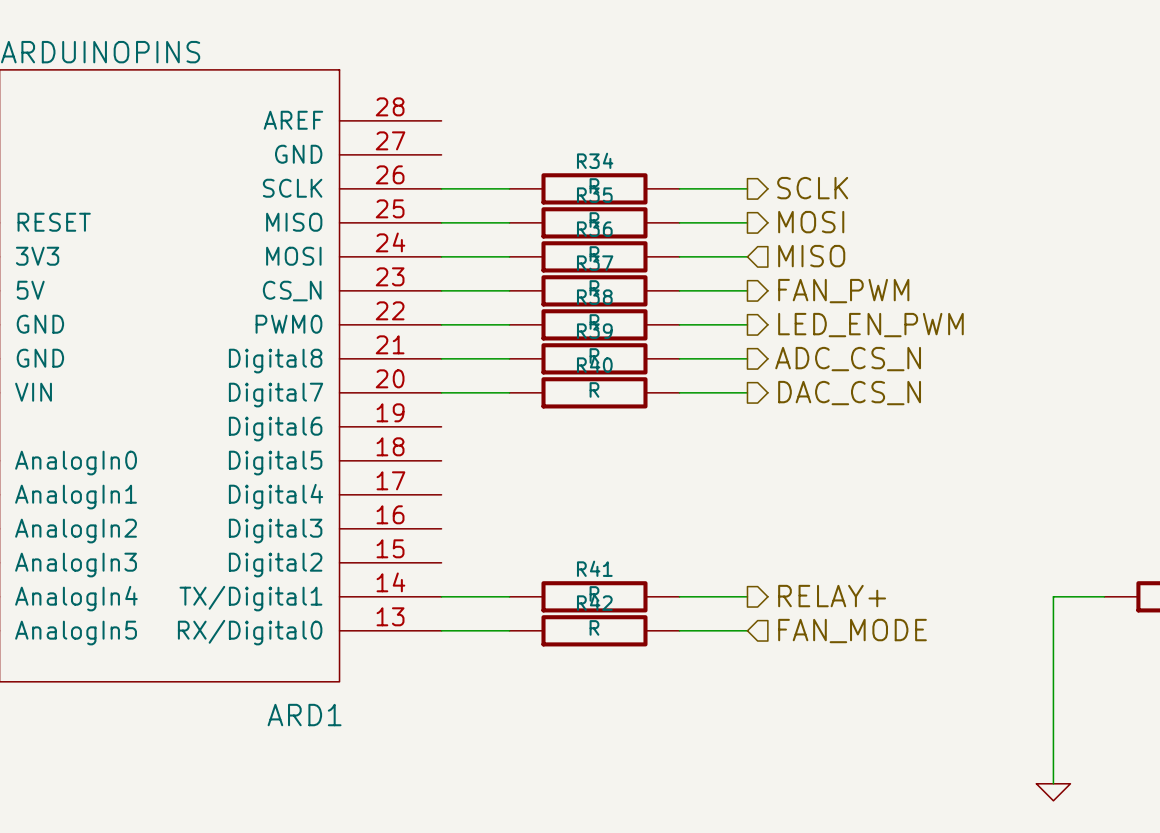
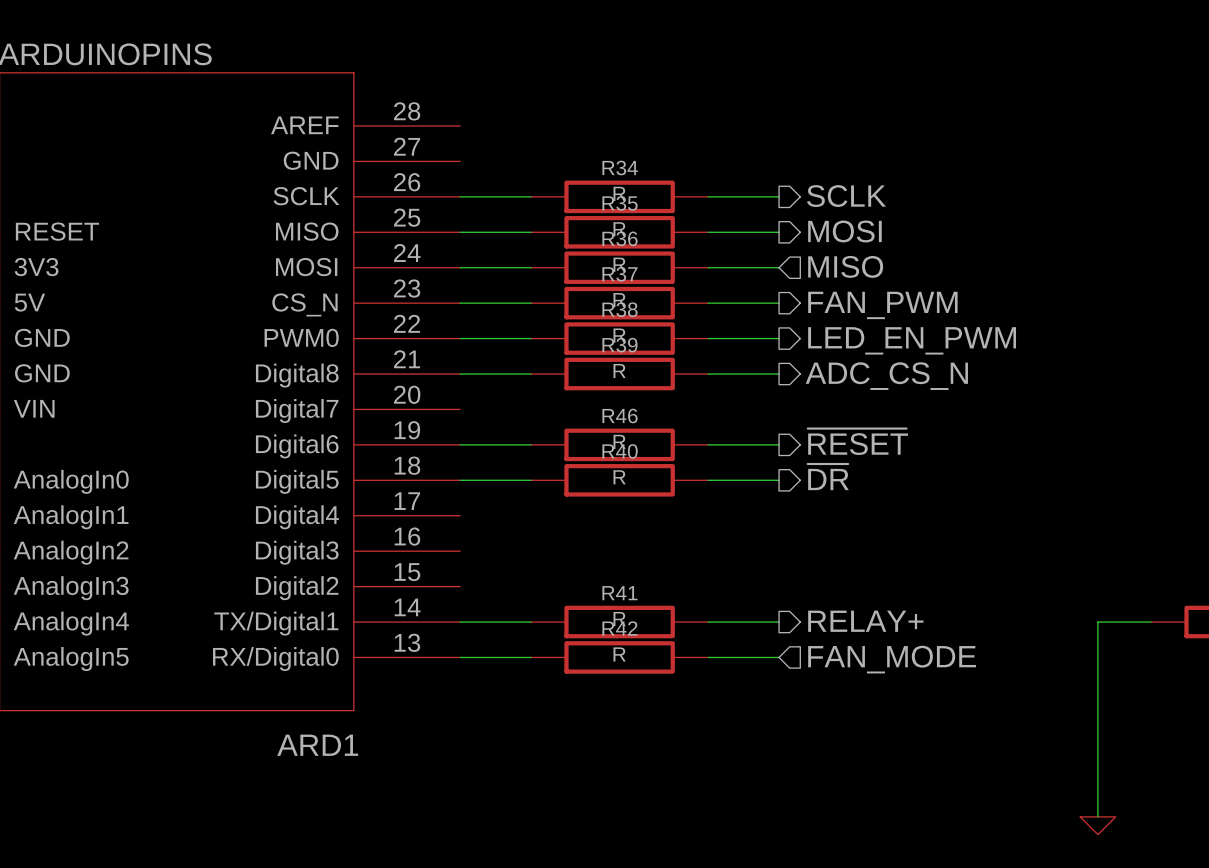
wire: (441, 392) (509, 392) -> (460, 444) (531, 444)
R40 position: (594, 392) -> (619, 480)
wire: (679, 392) (747, 392) -> (708, 444) (779, 444)
hierarchical label: DAC_CS_N (849, 393) -> none
hierarchical label: none -> ~{RESET} (857, 441)
R46: none -> R (619, 444)
hierarchical label: none -> ~{DR} (828, 477)
wire: none -> (460, 480) (531, 480)
wire: none -> (708, 480) (779, 480)

